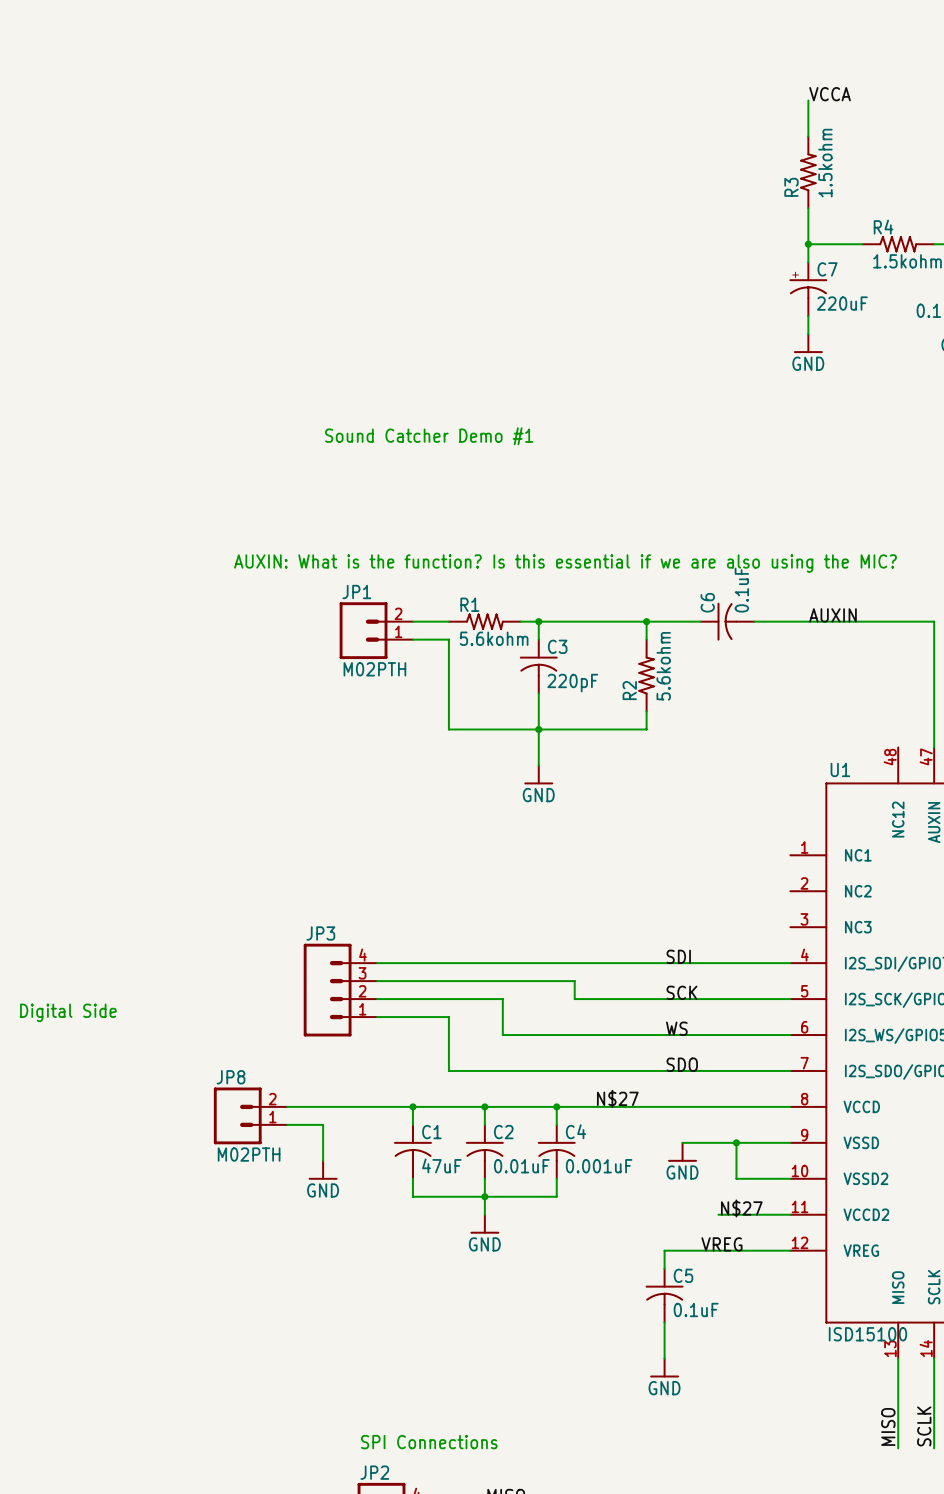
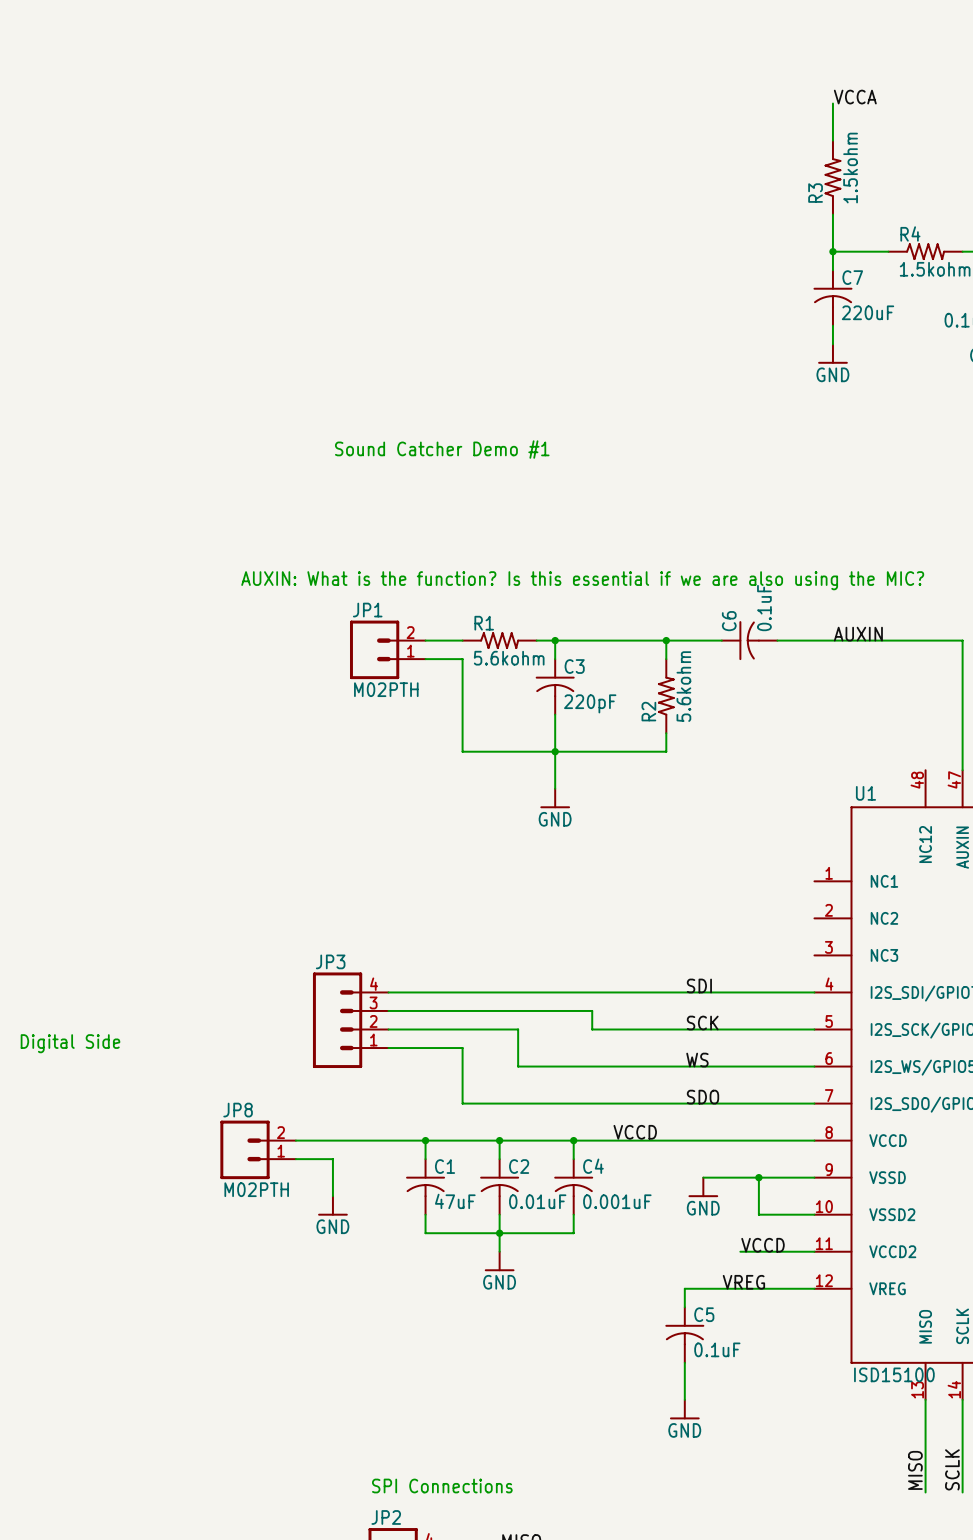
C7 symbol: [789, 262, 828, 317] -> [813, 270, 853, 326]
label: N$27 (617, 1098) -> VCCD (635, 1132)
label: N$27 (741, 1208) -> VCCD (763, 1245)

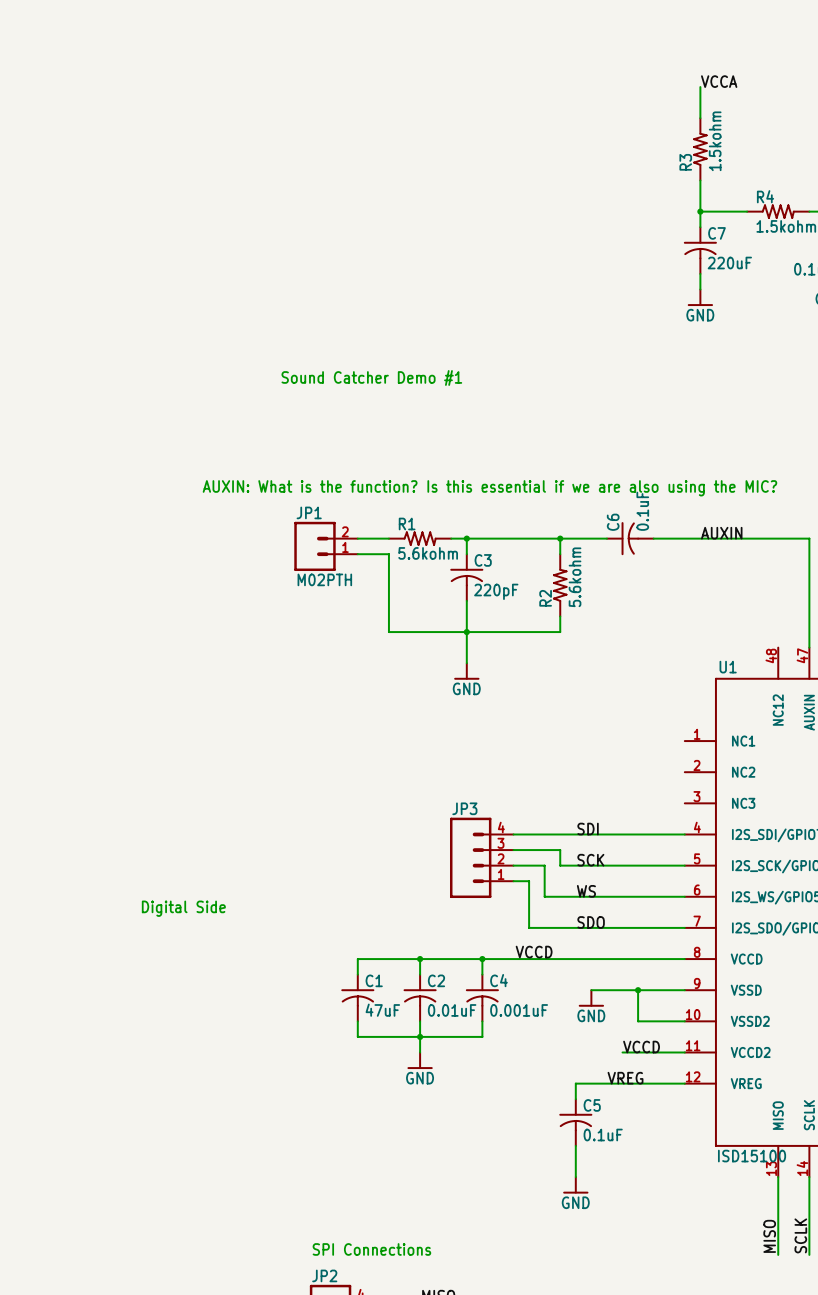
wire: (388, 992) (610, 992) -> none
wire: (388, 1010) (592, 1010) (592, 1029) (610, 1029) -> none
JP3 position: (350, 1020) -> (481, 857)
wire: (388, 1029) (518, 1029) (518, 1066) (647, 1066) -> (544, 865) (544, 896)
wire: (647, 1029) (666, 1029) -> (513, 850) (560, 850) (560, 865)
text position: Digital Side (70, 1043) -> Digital Side (183, 908)
wire: (388, 1048) (462, 1048) (462, 1103) (629, 1103) -> (513, 881) (529, 881) (529, 927)
wire: (295, 1140) (425, 1140) -> none
junction: (425, 1140) -> none
JP8: M02PTH (258, 1149) -> none
wire: (295, 1159) (332, 1159) (332, 1196) -> none
power symbol: GND (332, 1205) -> none

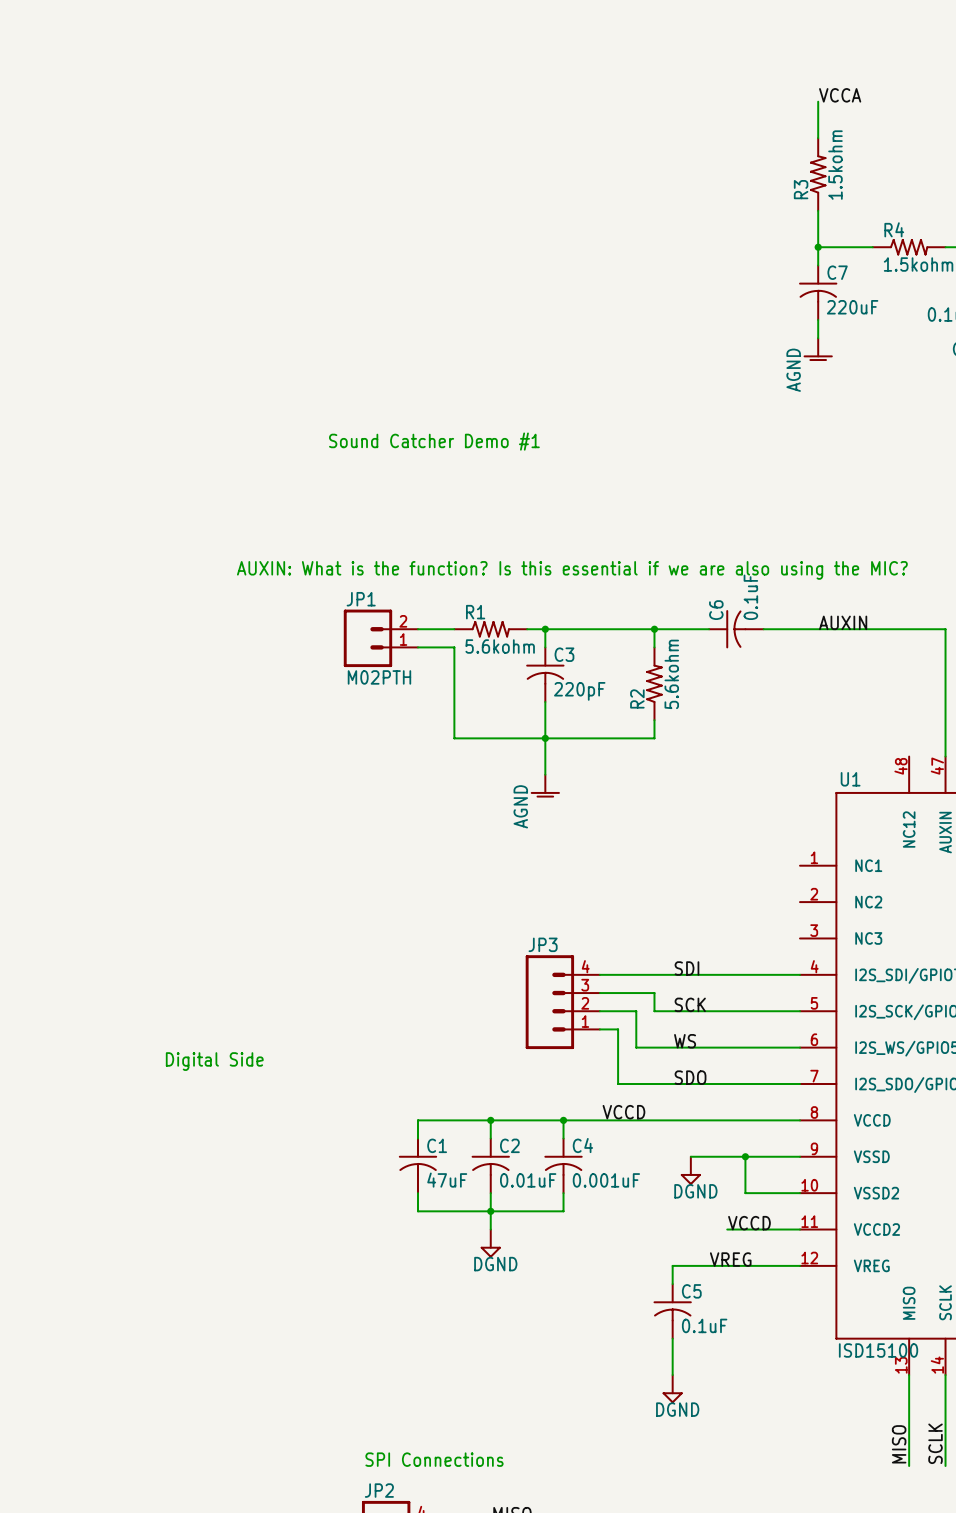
power symbol: GND (700, 297) -> AGND (818, 349)
power symbol: GND (466, 671) -> AGND (545, 786)
power symbol: GND (591, 998) -> DGND (690, 1170)
power symbol: GND (420, 1060) -> DGND (490, 1243)
power symbol: GND (575, 1185) -> DGND (672, 1389)

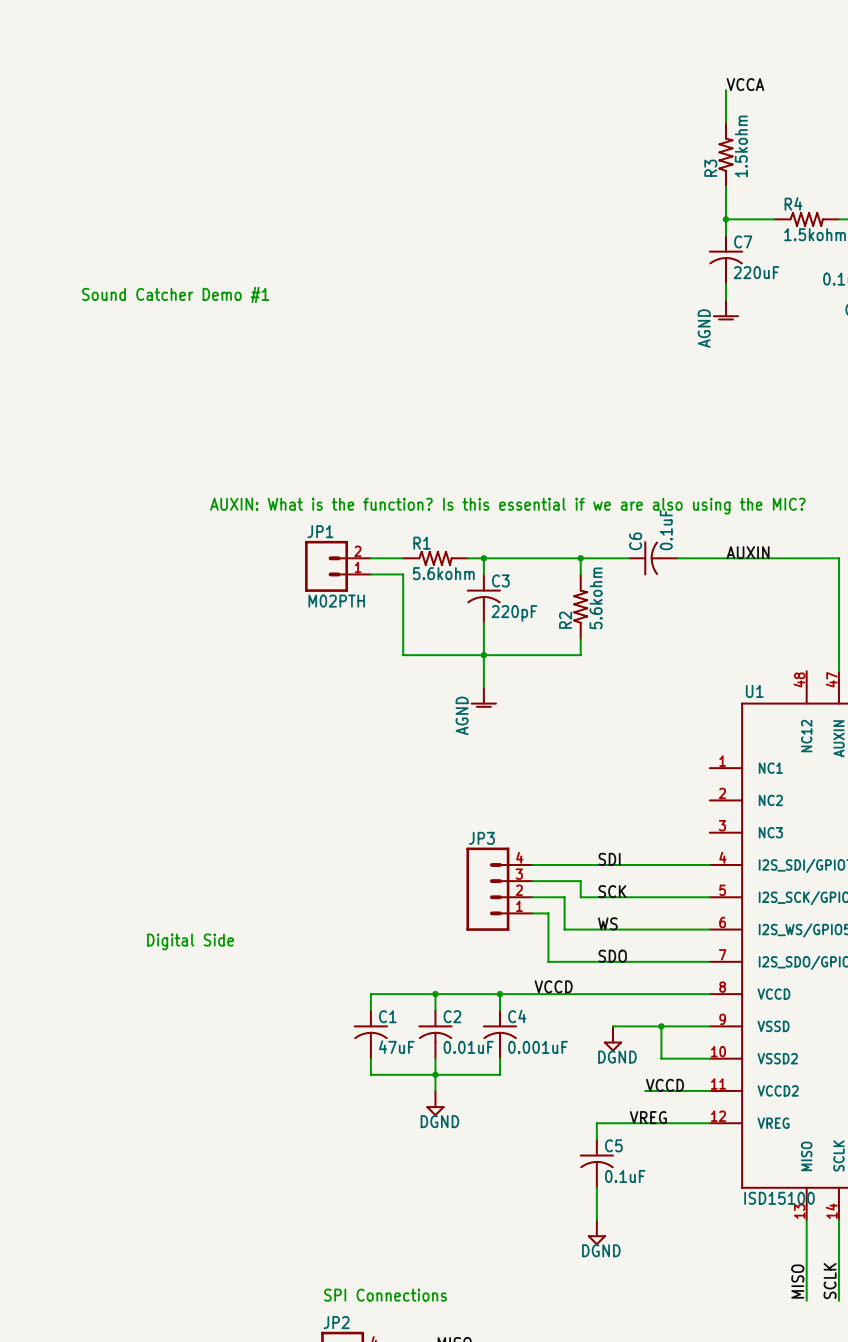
text: none -> Sound Catcher Demo #1 (175, 294)
text: Sound Catcher Demo #1 (434, 441) -> none

